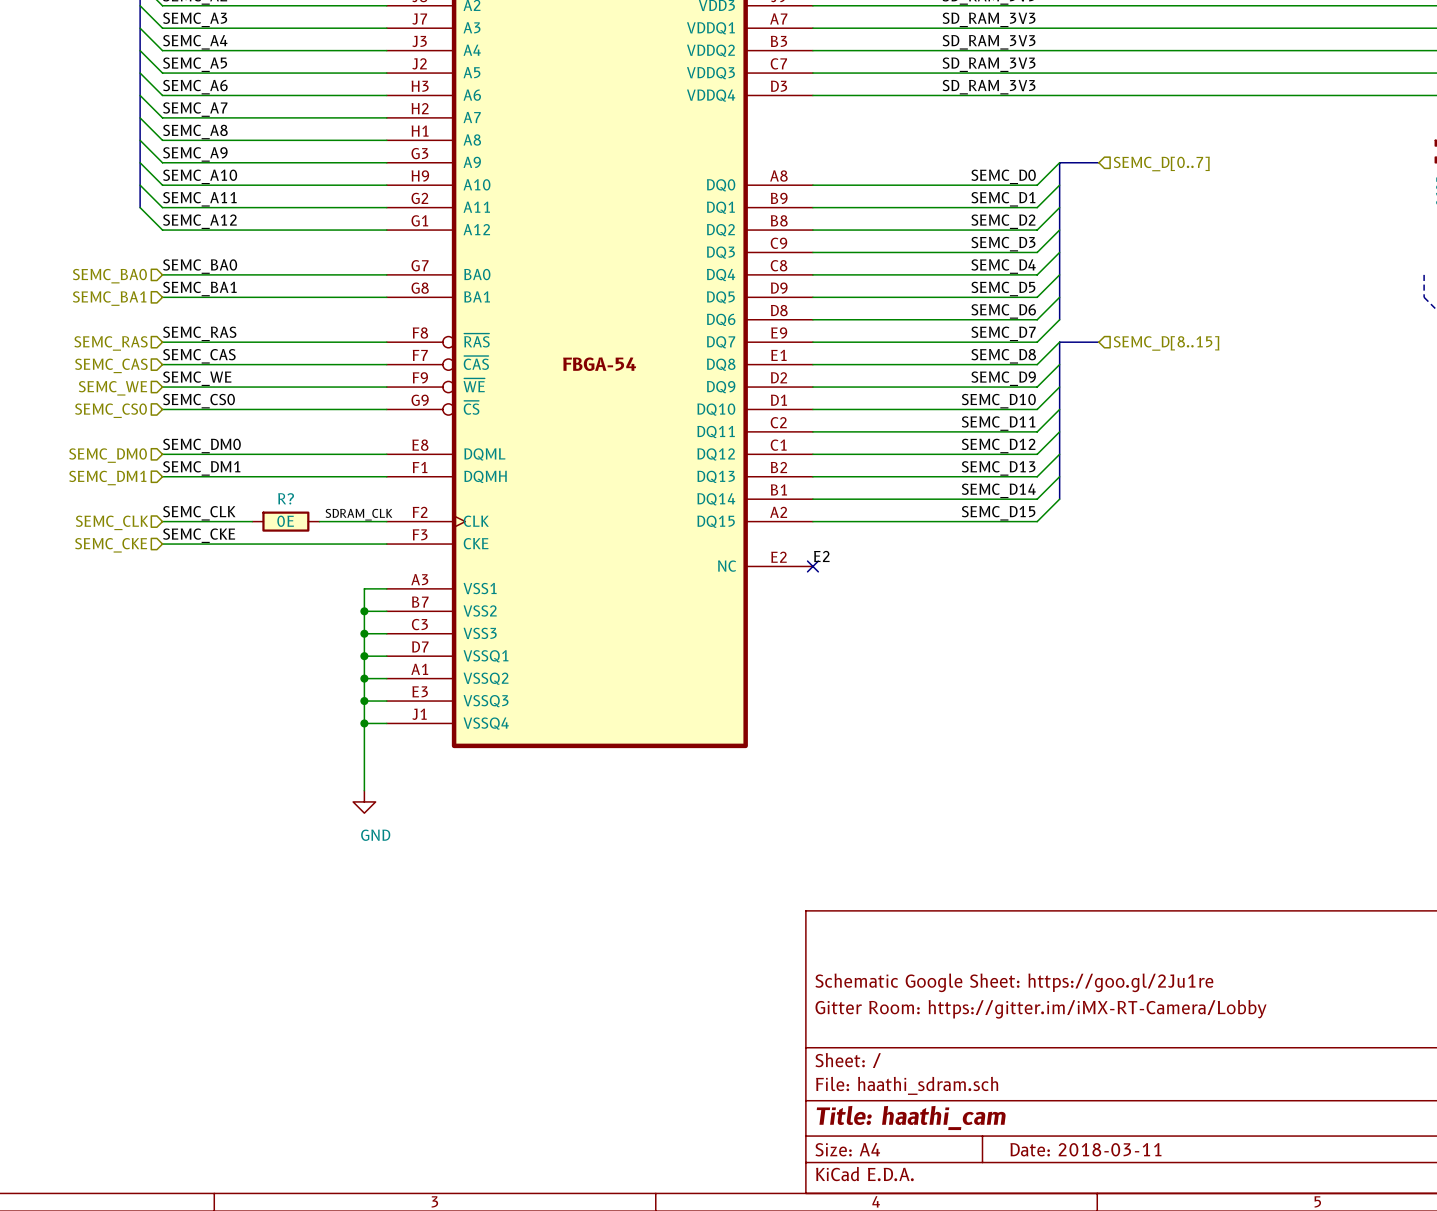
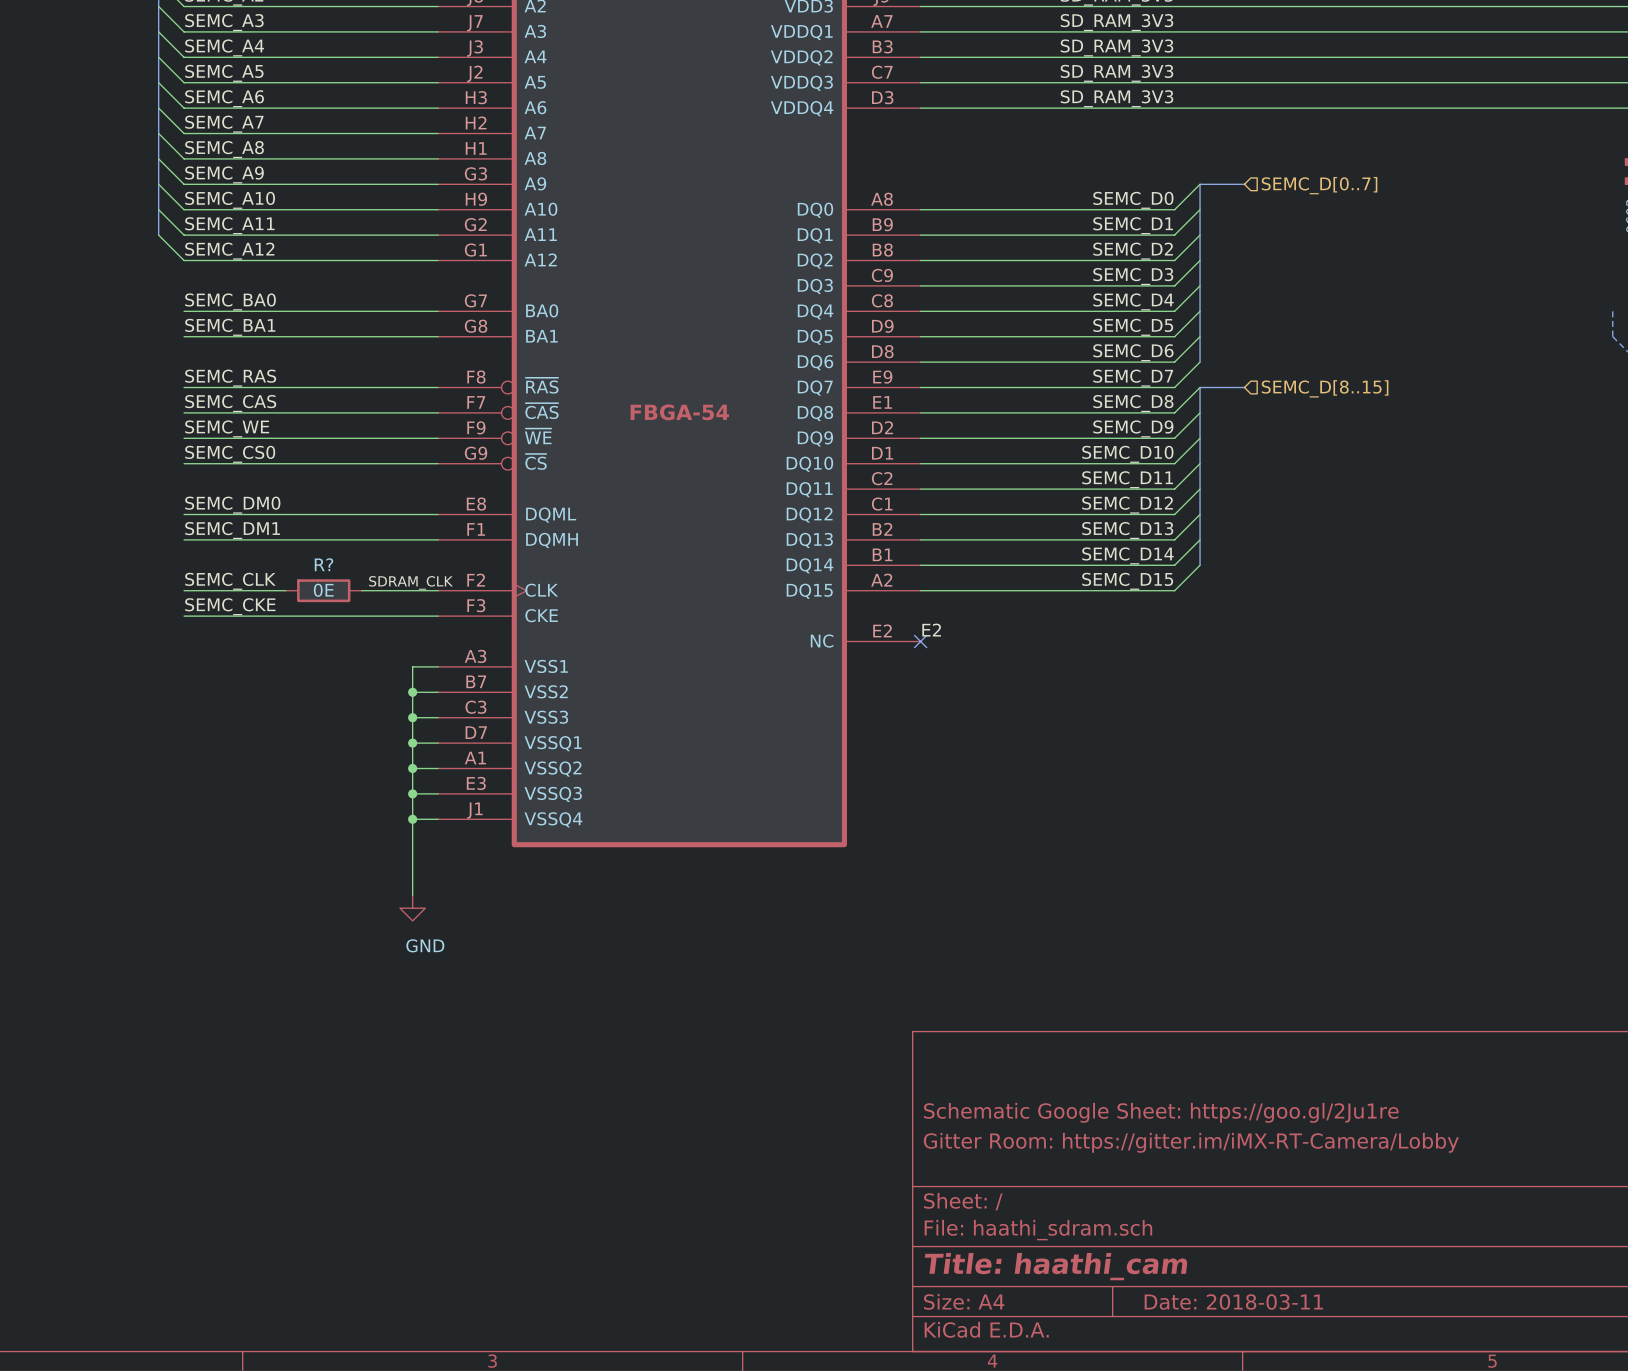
hierarchical label: SEMC_BA0 (109, 276) -> none
hierarchical label: SEMC_BA1 (109, 298) -> none
hierarchical label: SEMC_RAS (111, 343) -> none
hierarchical label: SEMC_CAS (111, 365) -> none
hierarchical label: SEMC_WE (112, 388) -> none
hierarchical label: SEMC_CS0 (111, 410) -> none
hierarchical label: SEMC_DM0 (108, 455) -> none
hierarchical label: SEMC_DM1 (107, 478) -> none
hierarchical label: SEMC_CLK (112, 522) -> none
hierarchical label: SEMC_CKE (111, 545) -> none

